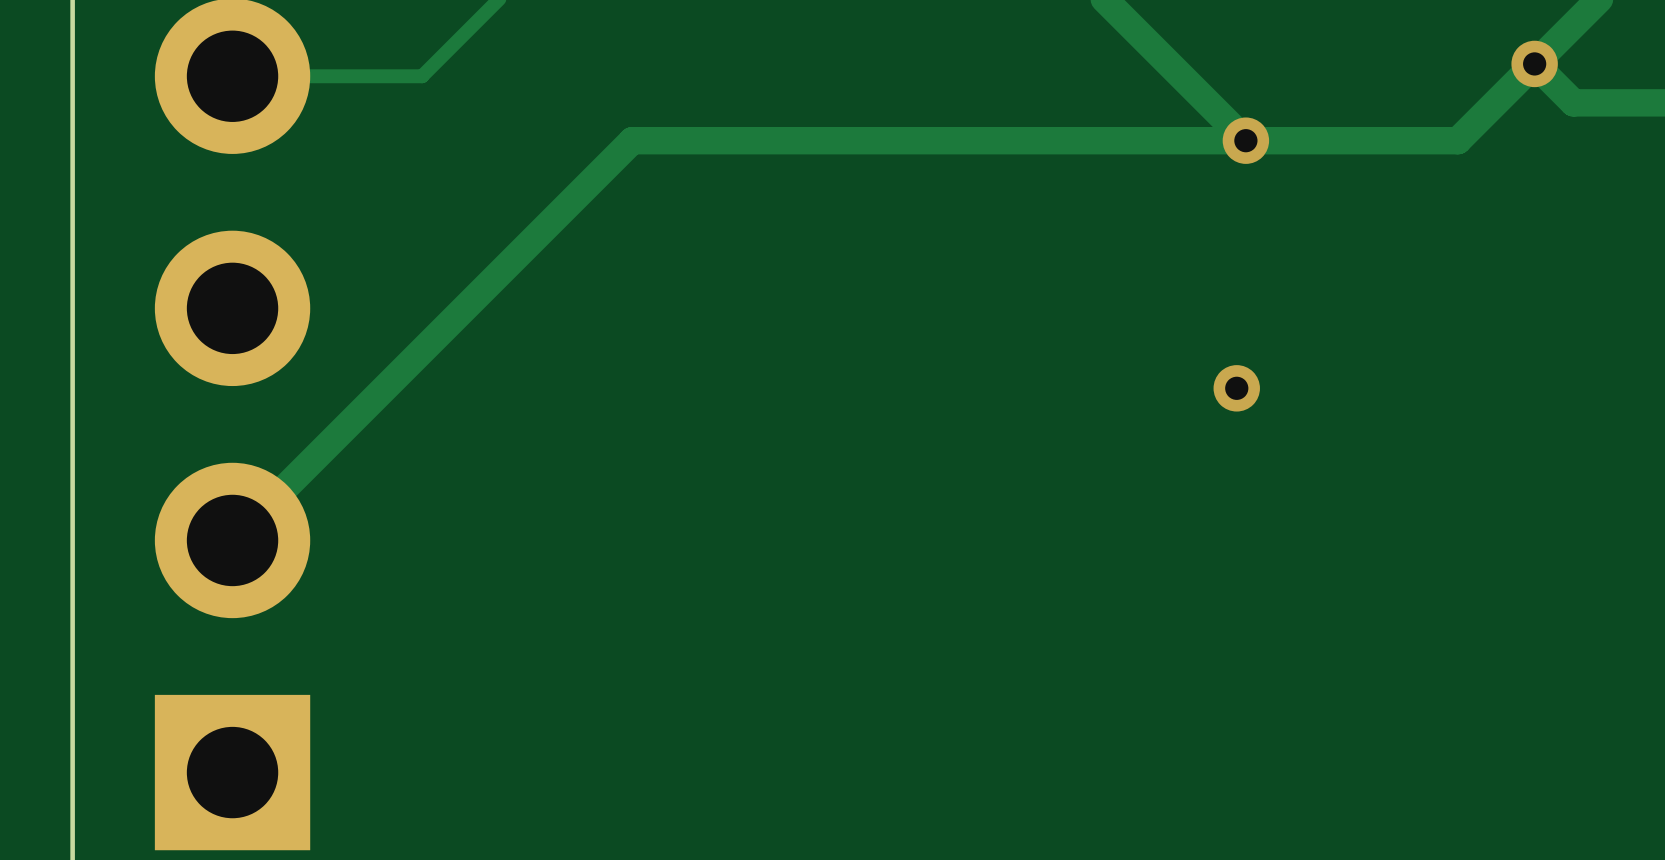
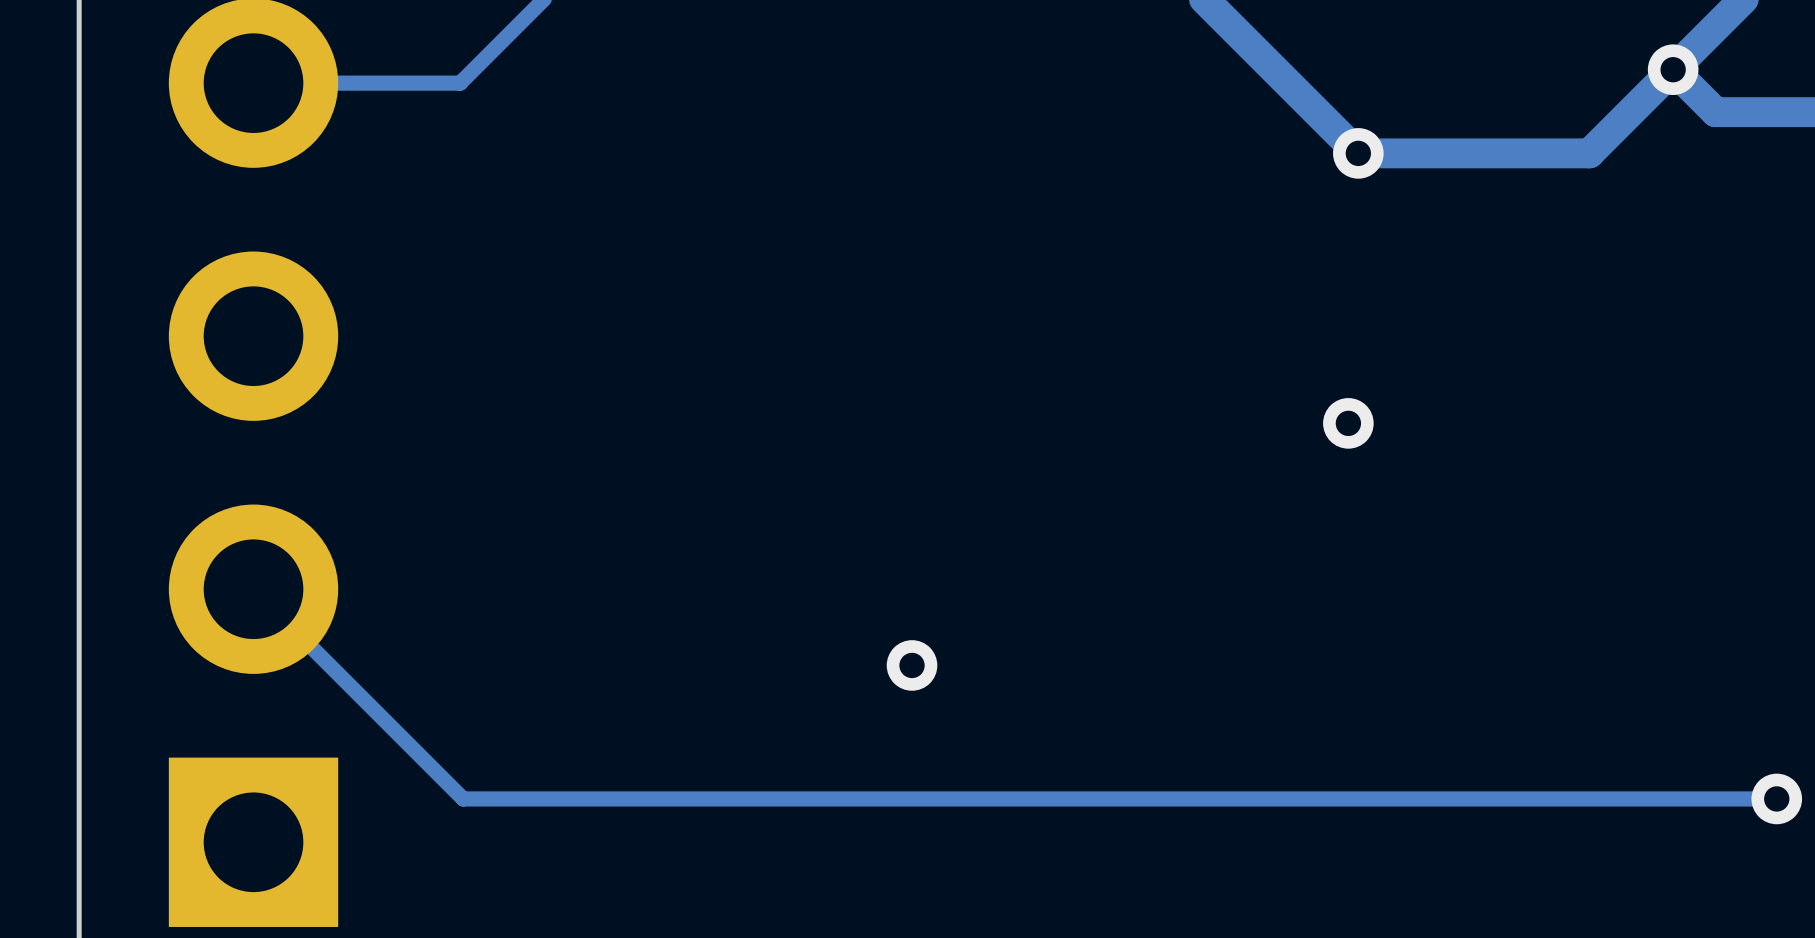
track: (1245, 140) (632, 140) (232, 540) -> (1776, 798) (463, 798) (253, 589)
via: none -> (912, 665)
via: none -> (1776, 798)

